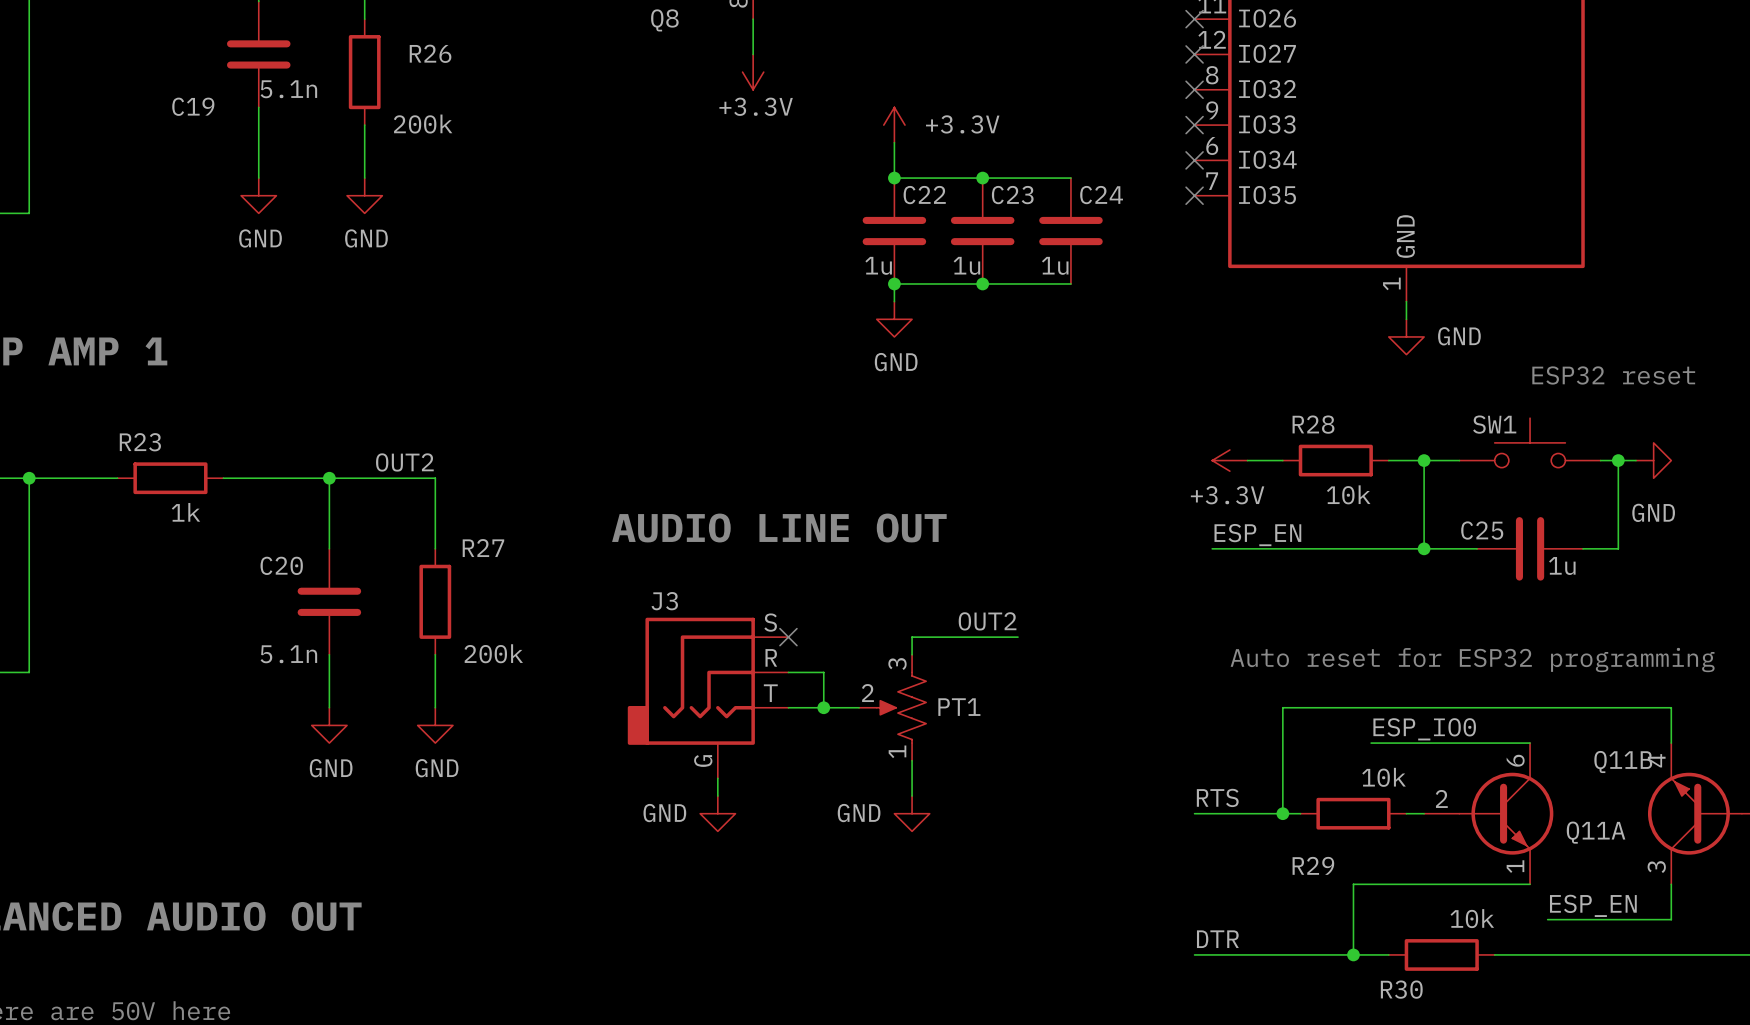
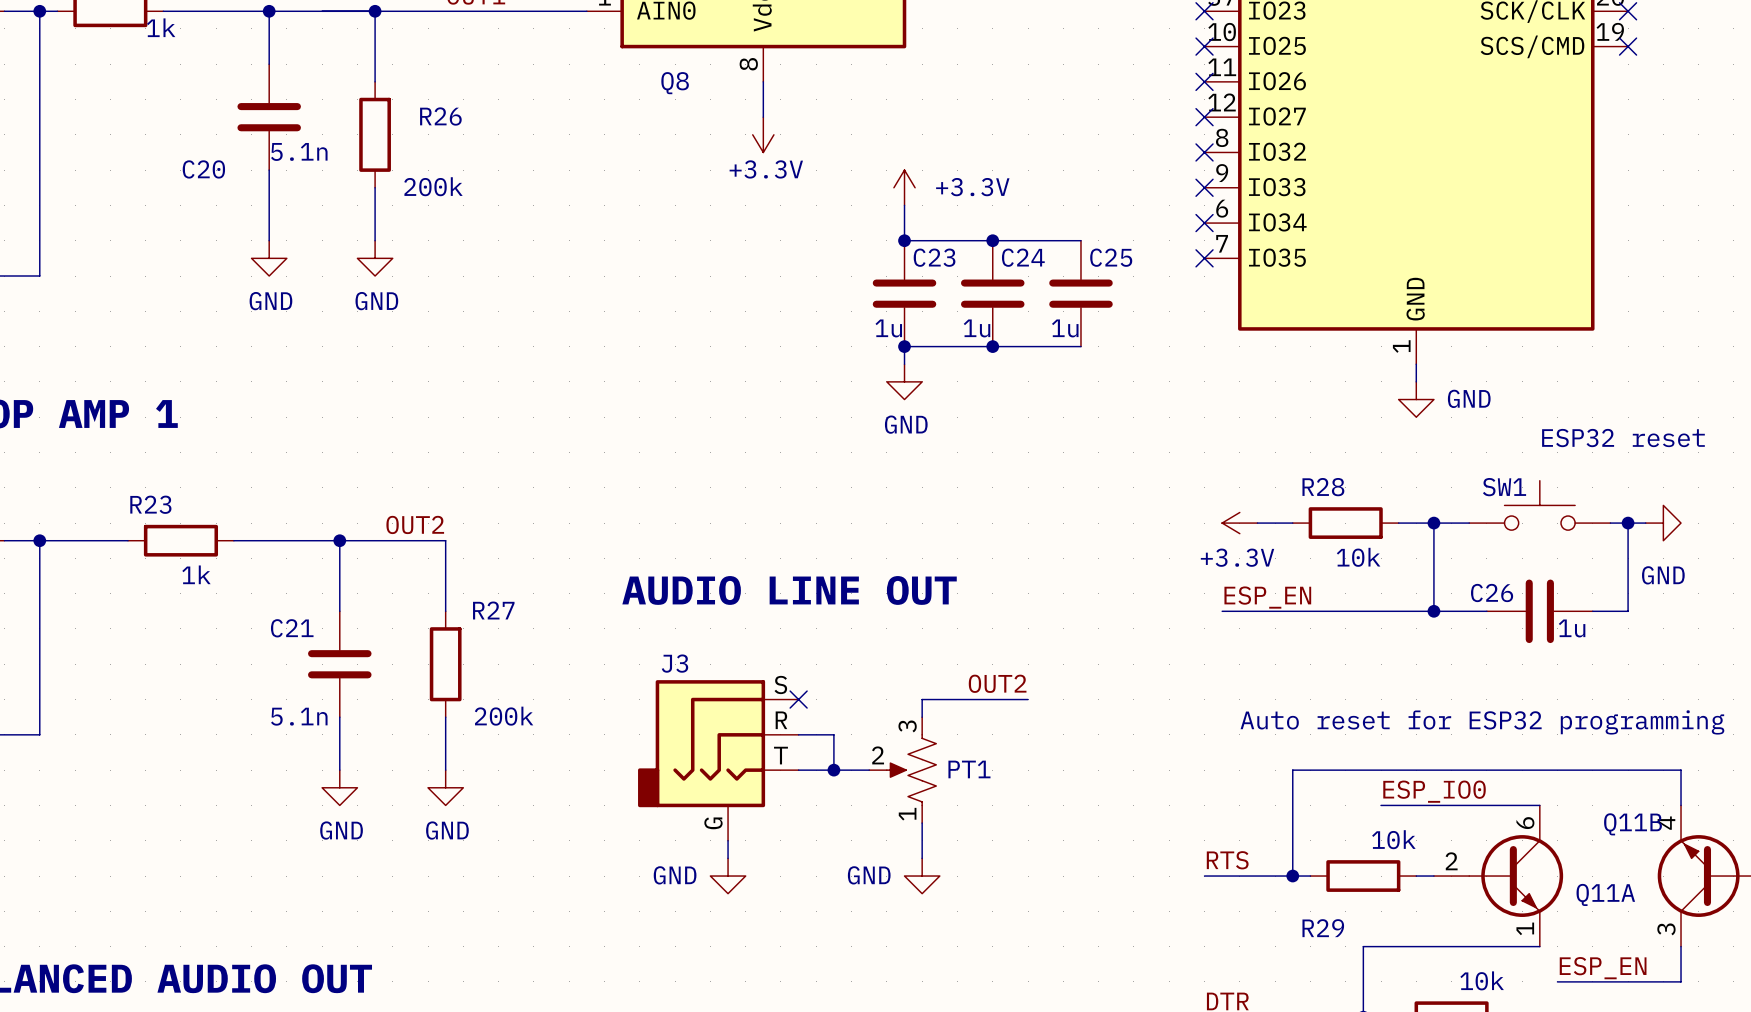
C19 name: C19 (193, 106) -> C20 (203, 169)
C22 name: C22 (924, 195) -> C23 (934, 257)
C23 name: C23 (1012, 195) -> C24 (1023, 257)
C24 name: C24 (1101, 195) -> C25 (1111, 257)
C25 name: C25 (1482, 530) -> C26 (1492, 593)
C20 name: C20 (281, 565) -> C21 (292, 628)

